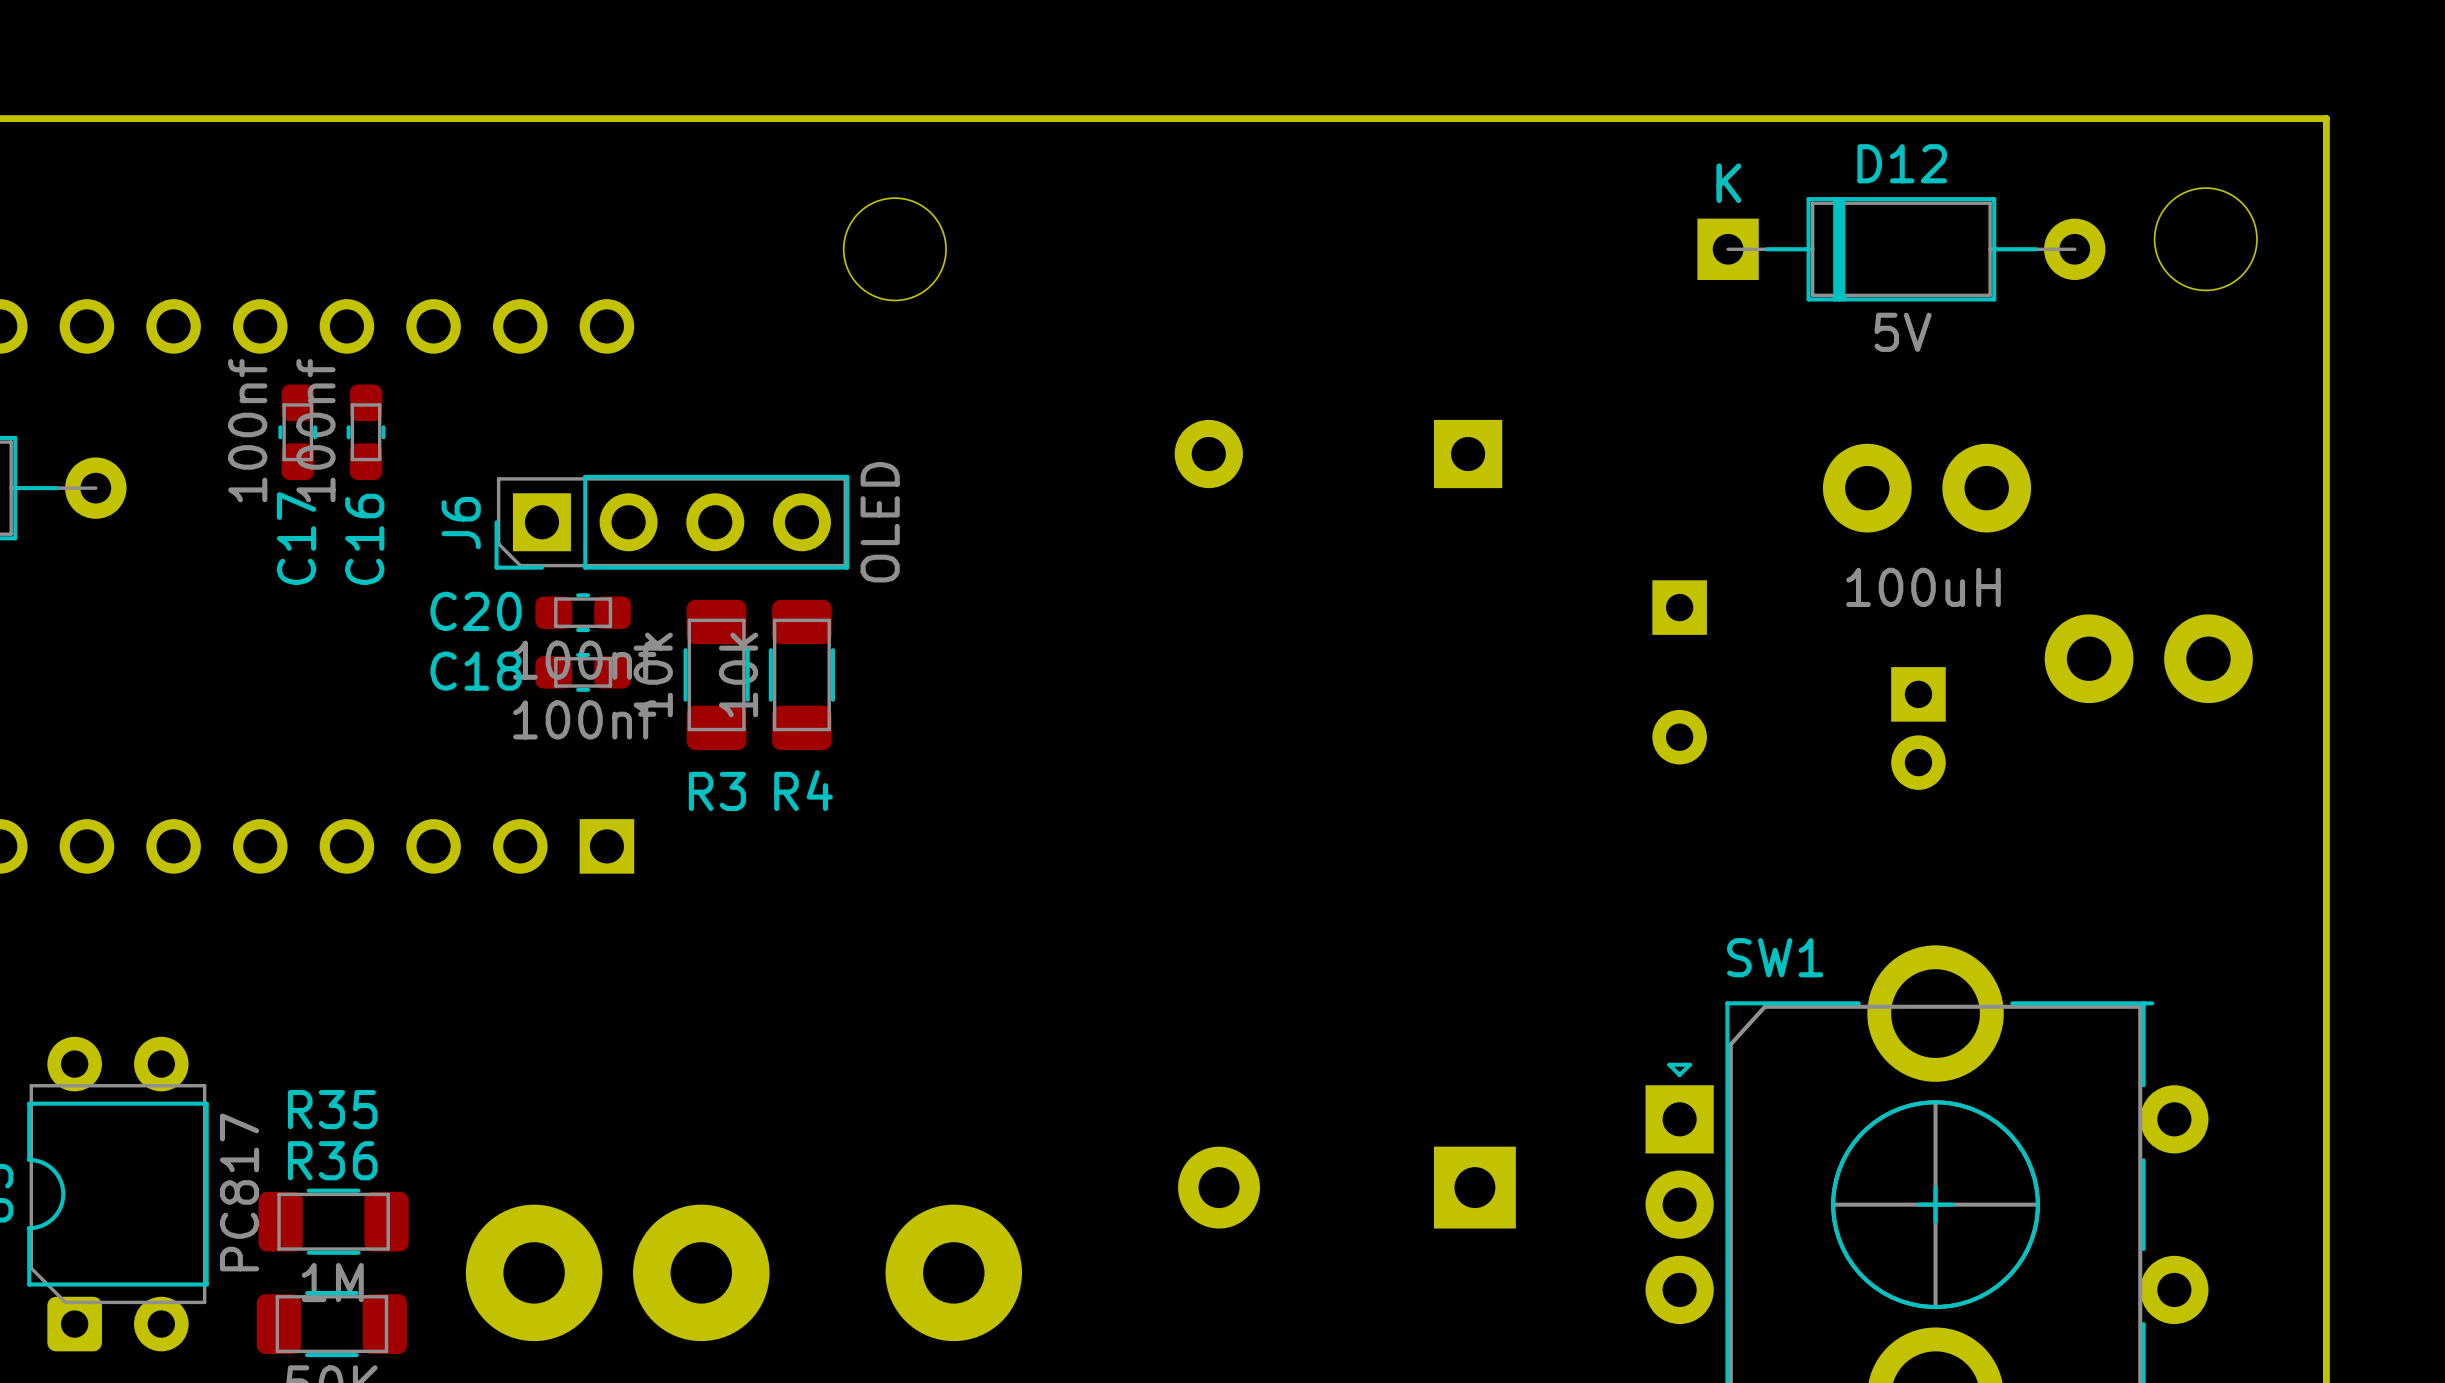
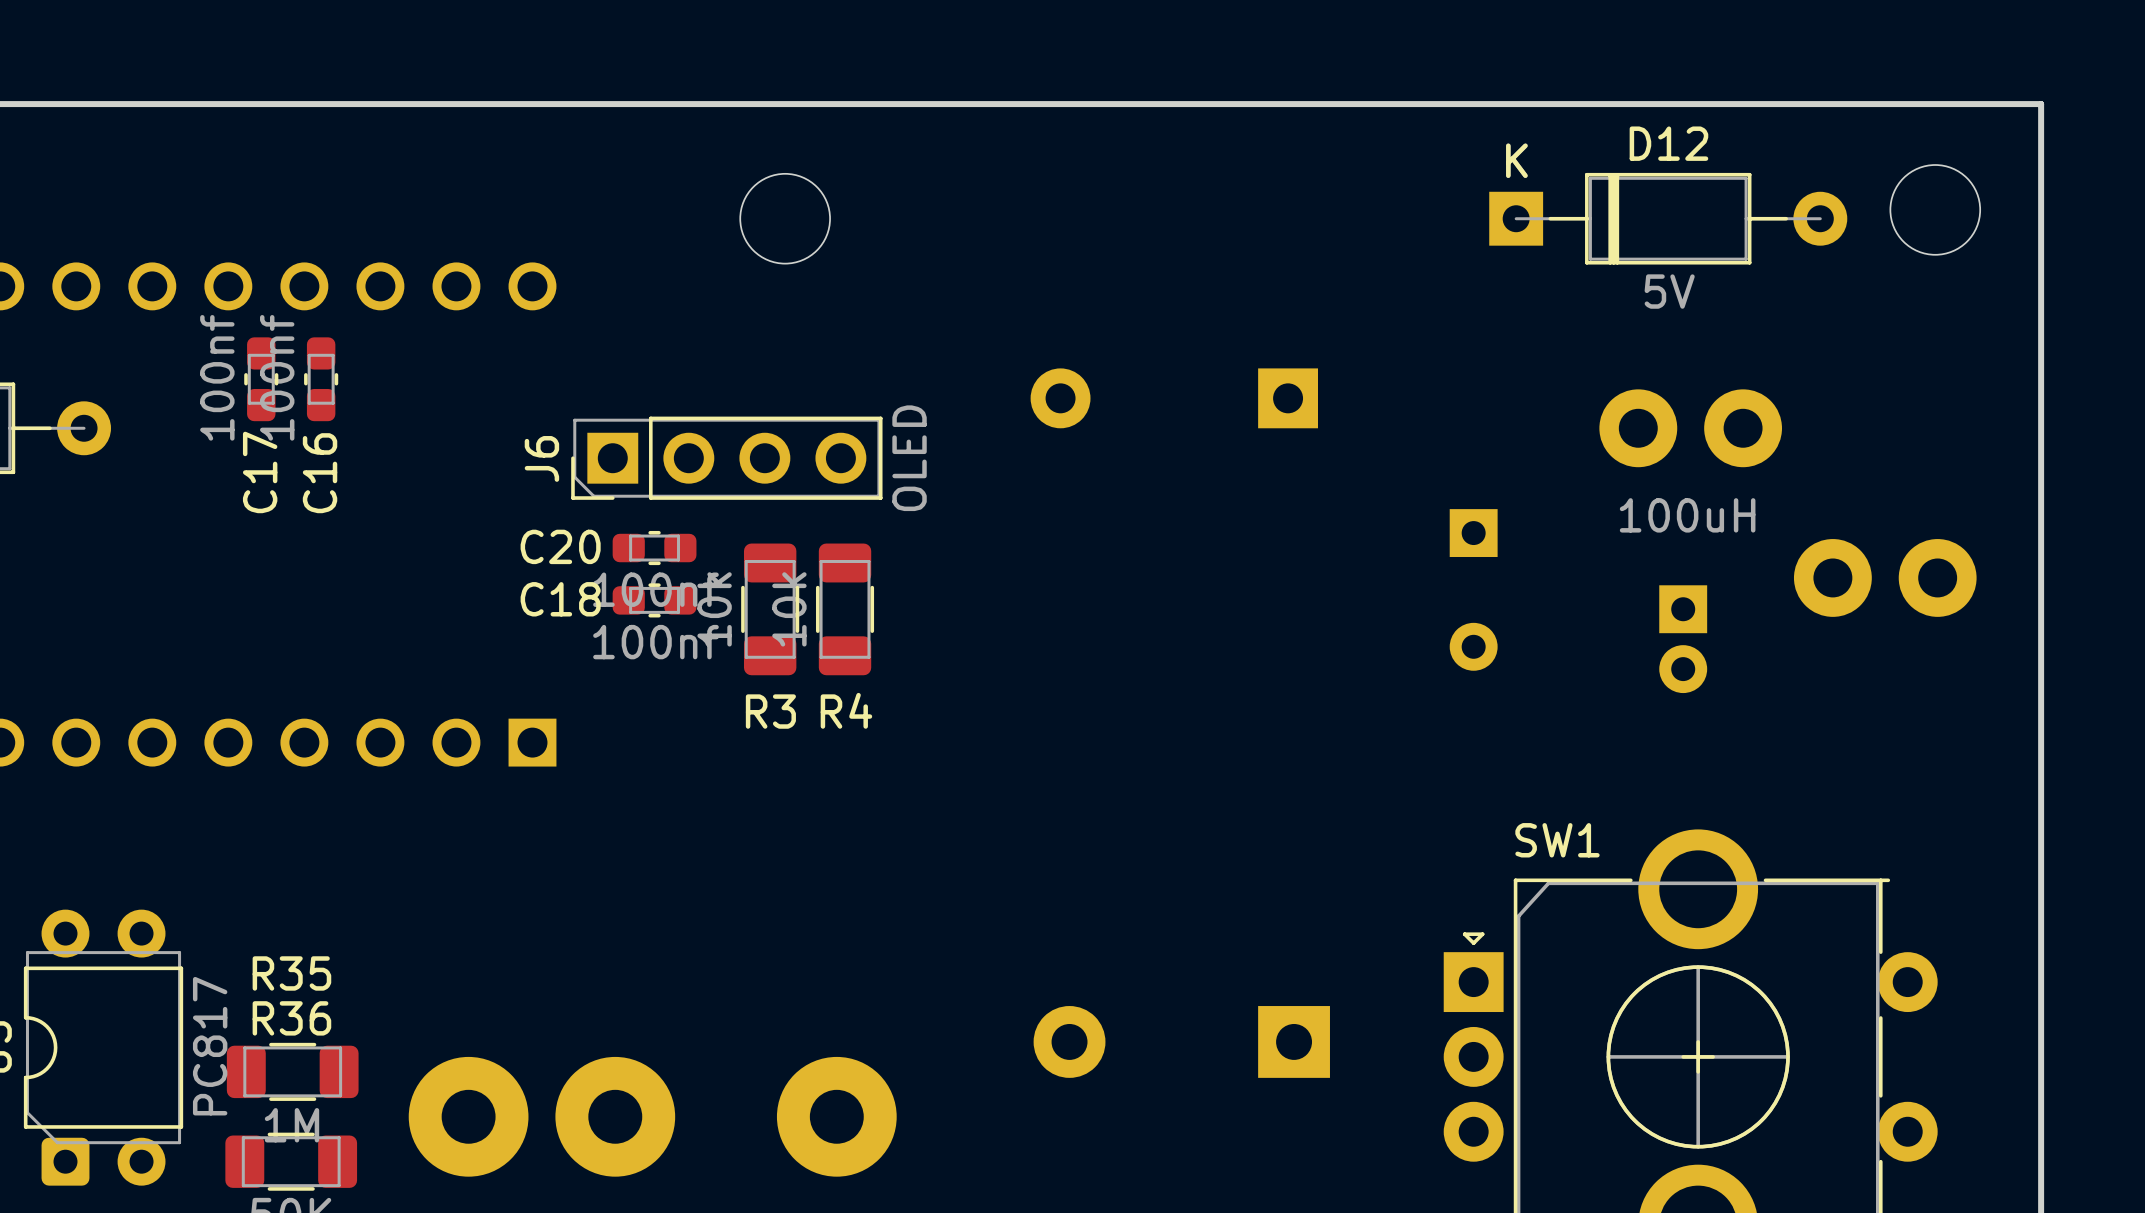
J6 position: (671, 522) -> (726, 458)
C20 position: (583, 612) -> (654, 548)
C18 position: (583, 672) -> (654, 600)
R3 position: (716, 674) -> (770, 609)
R4 position: (801, 674) -> (845, 609)

